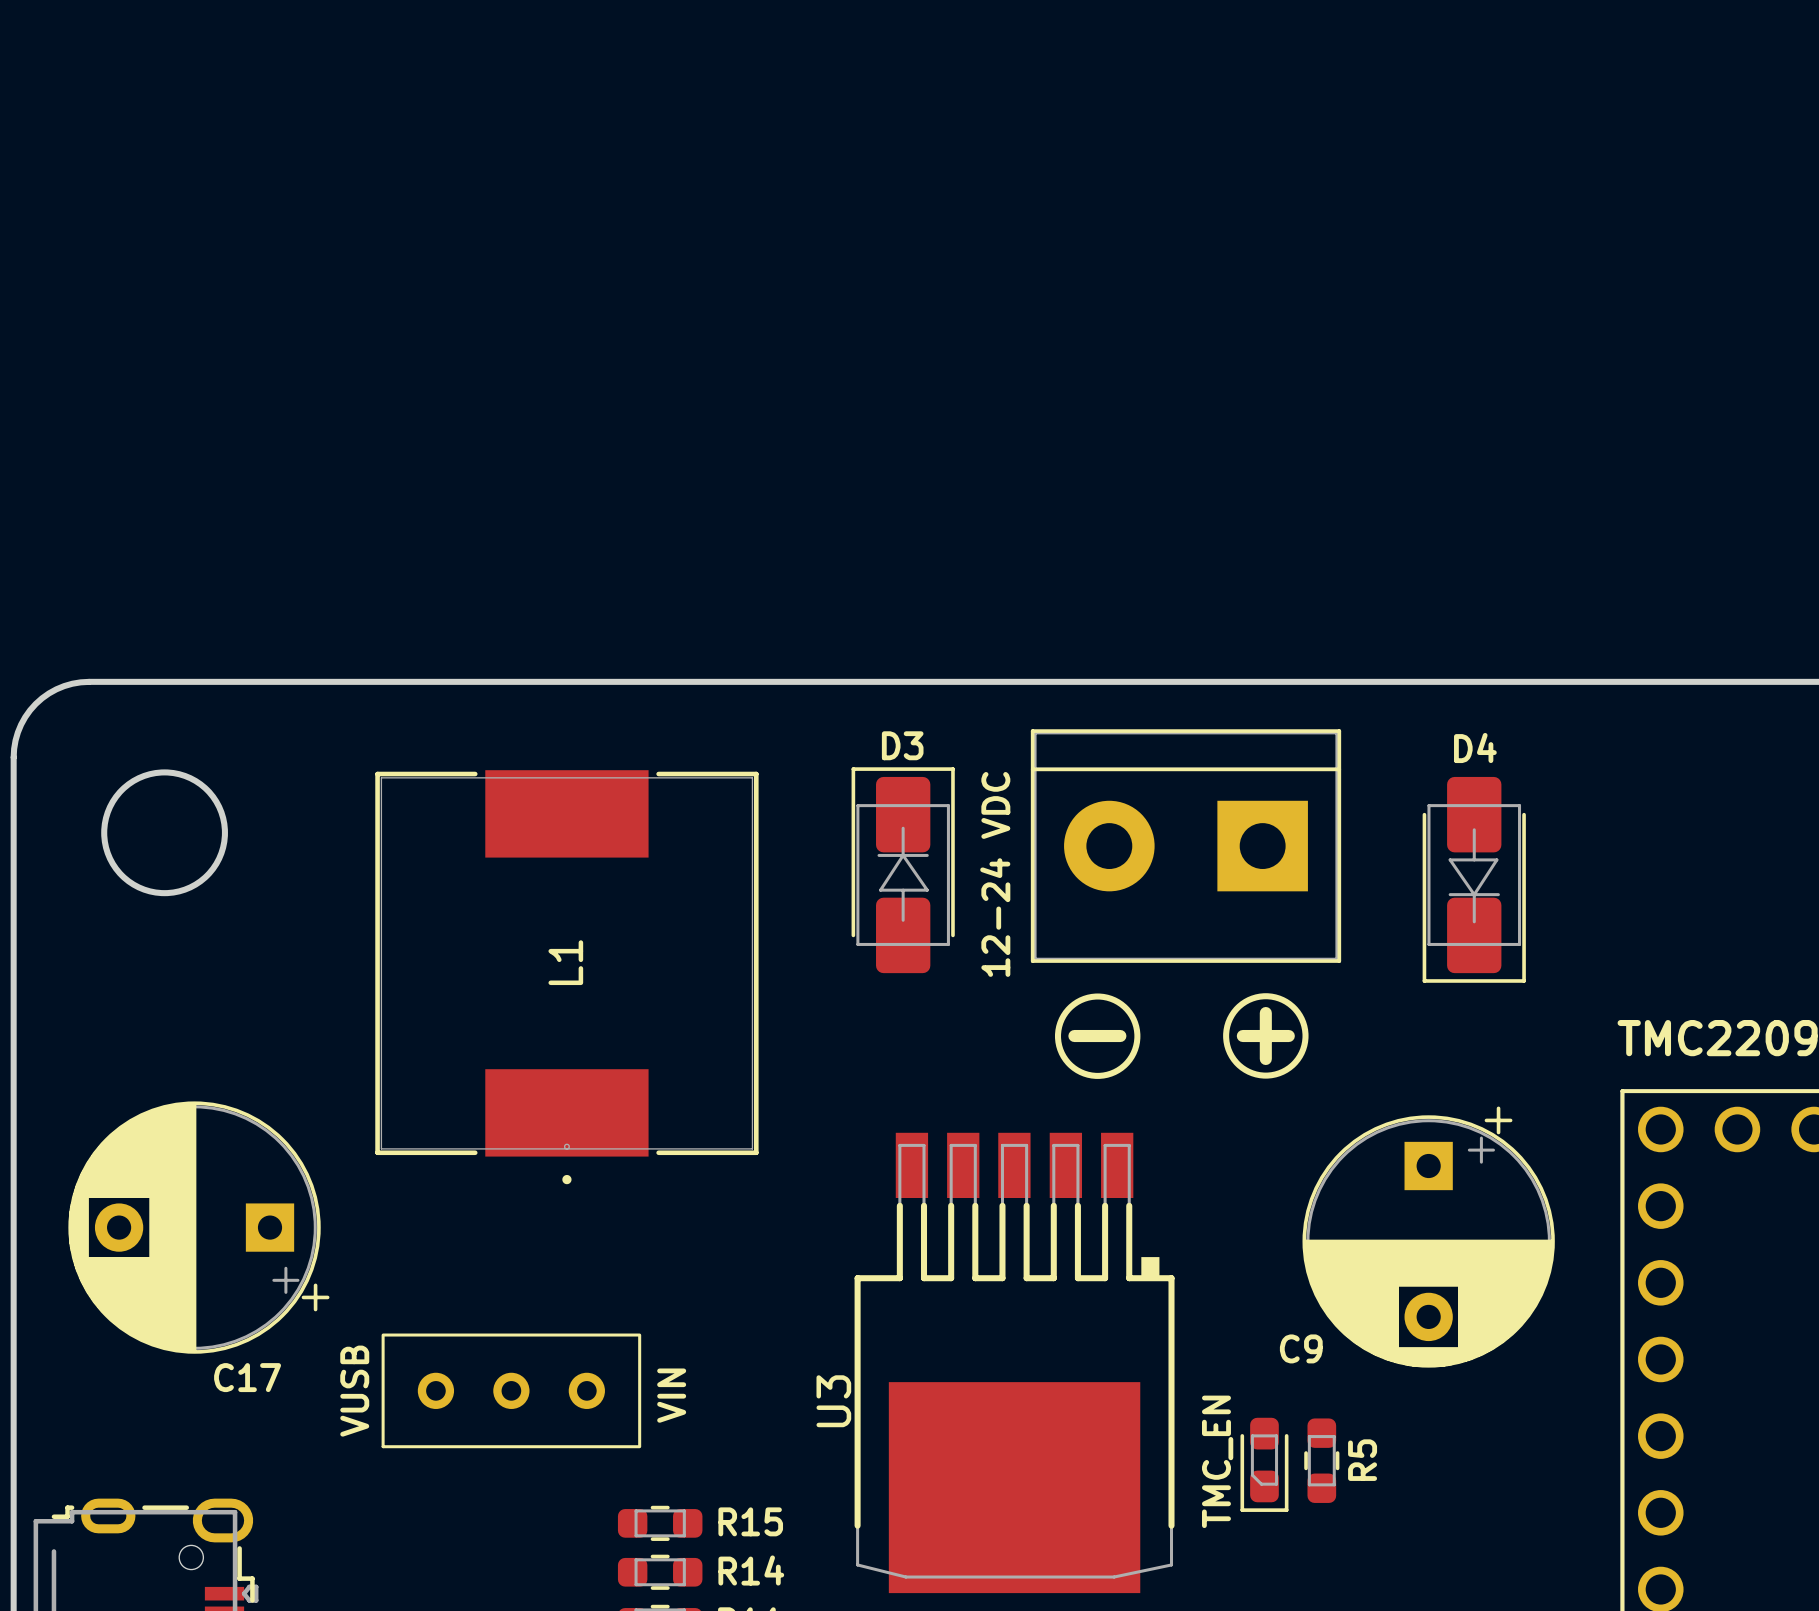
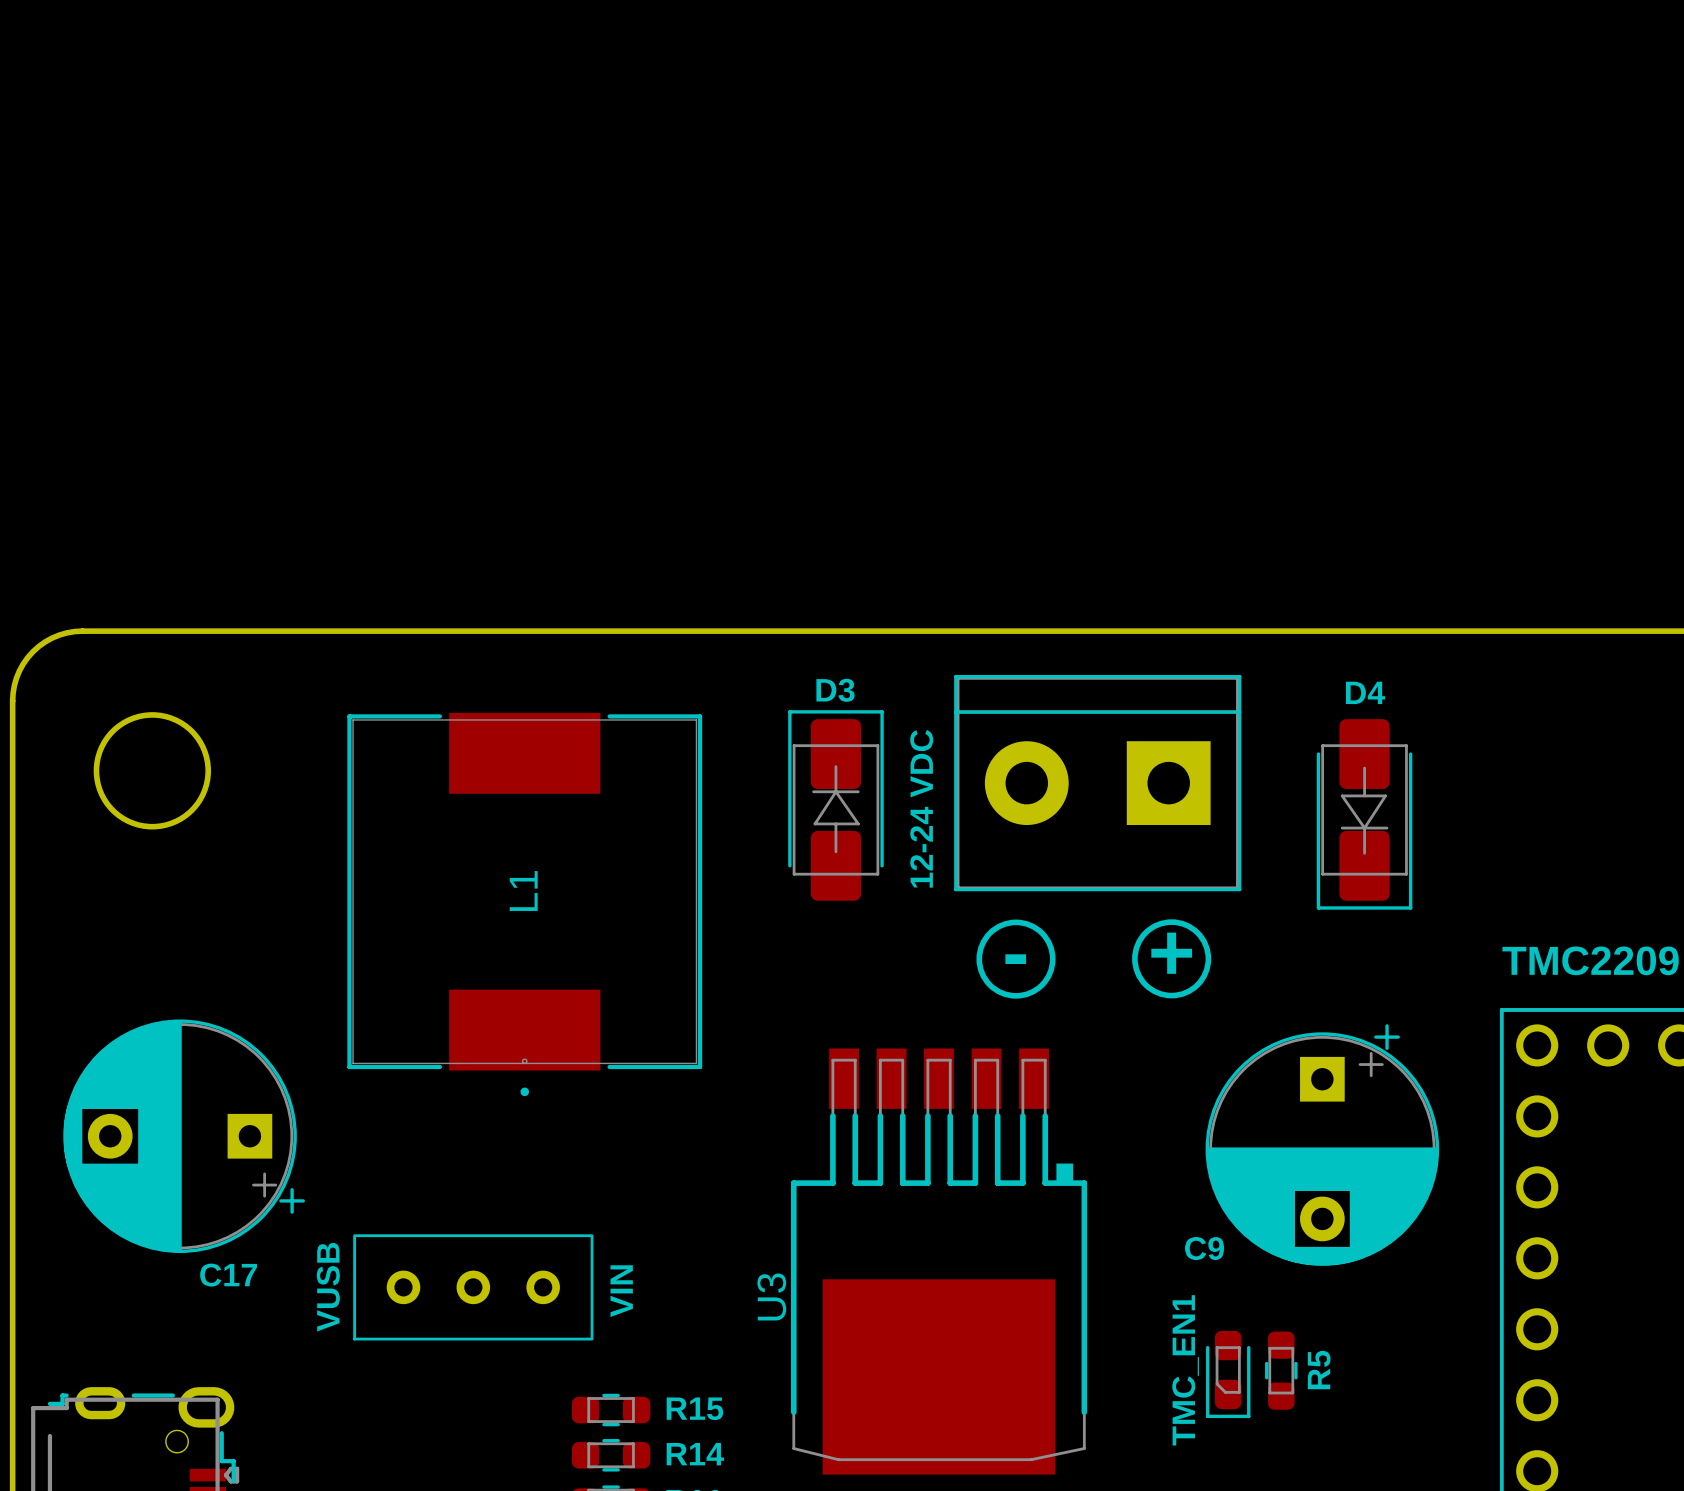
R5 position: (1321, 1460) -> (1281, 1370)
TMC_EN: (1264, 1464) -> none
TMC_EN1: none -> (1228, 1374)

